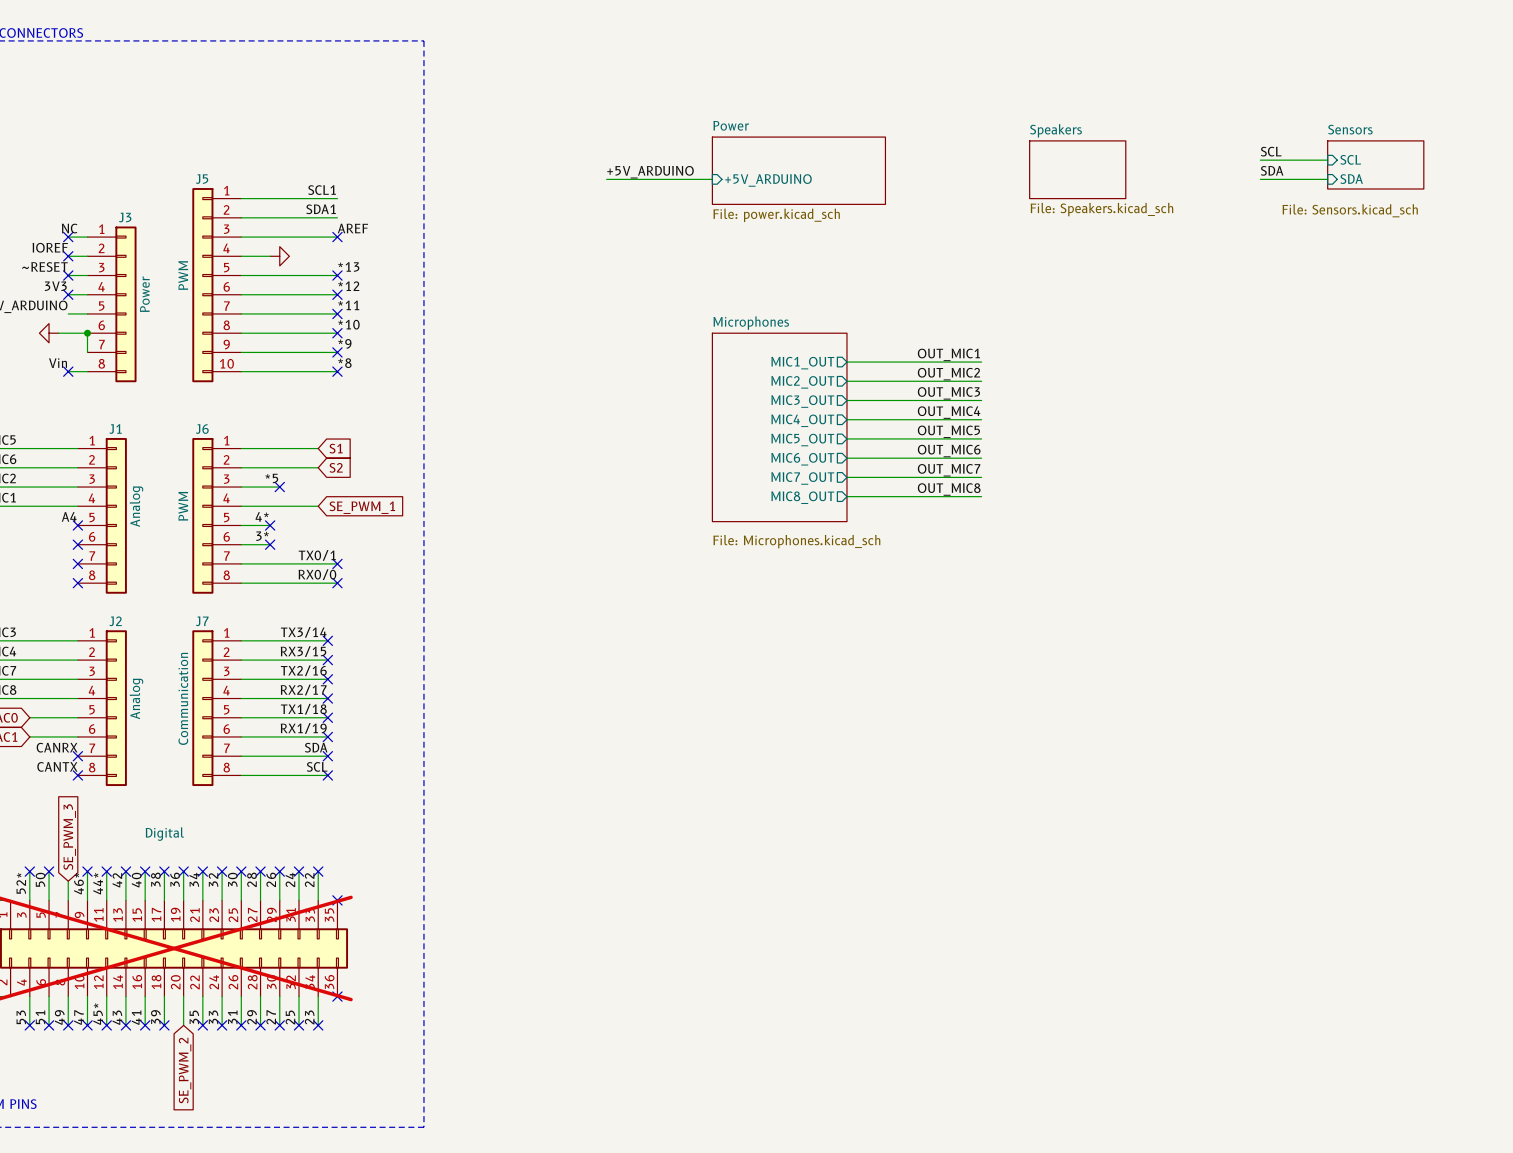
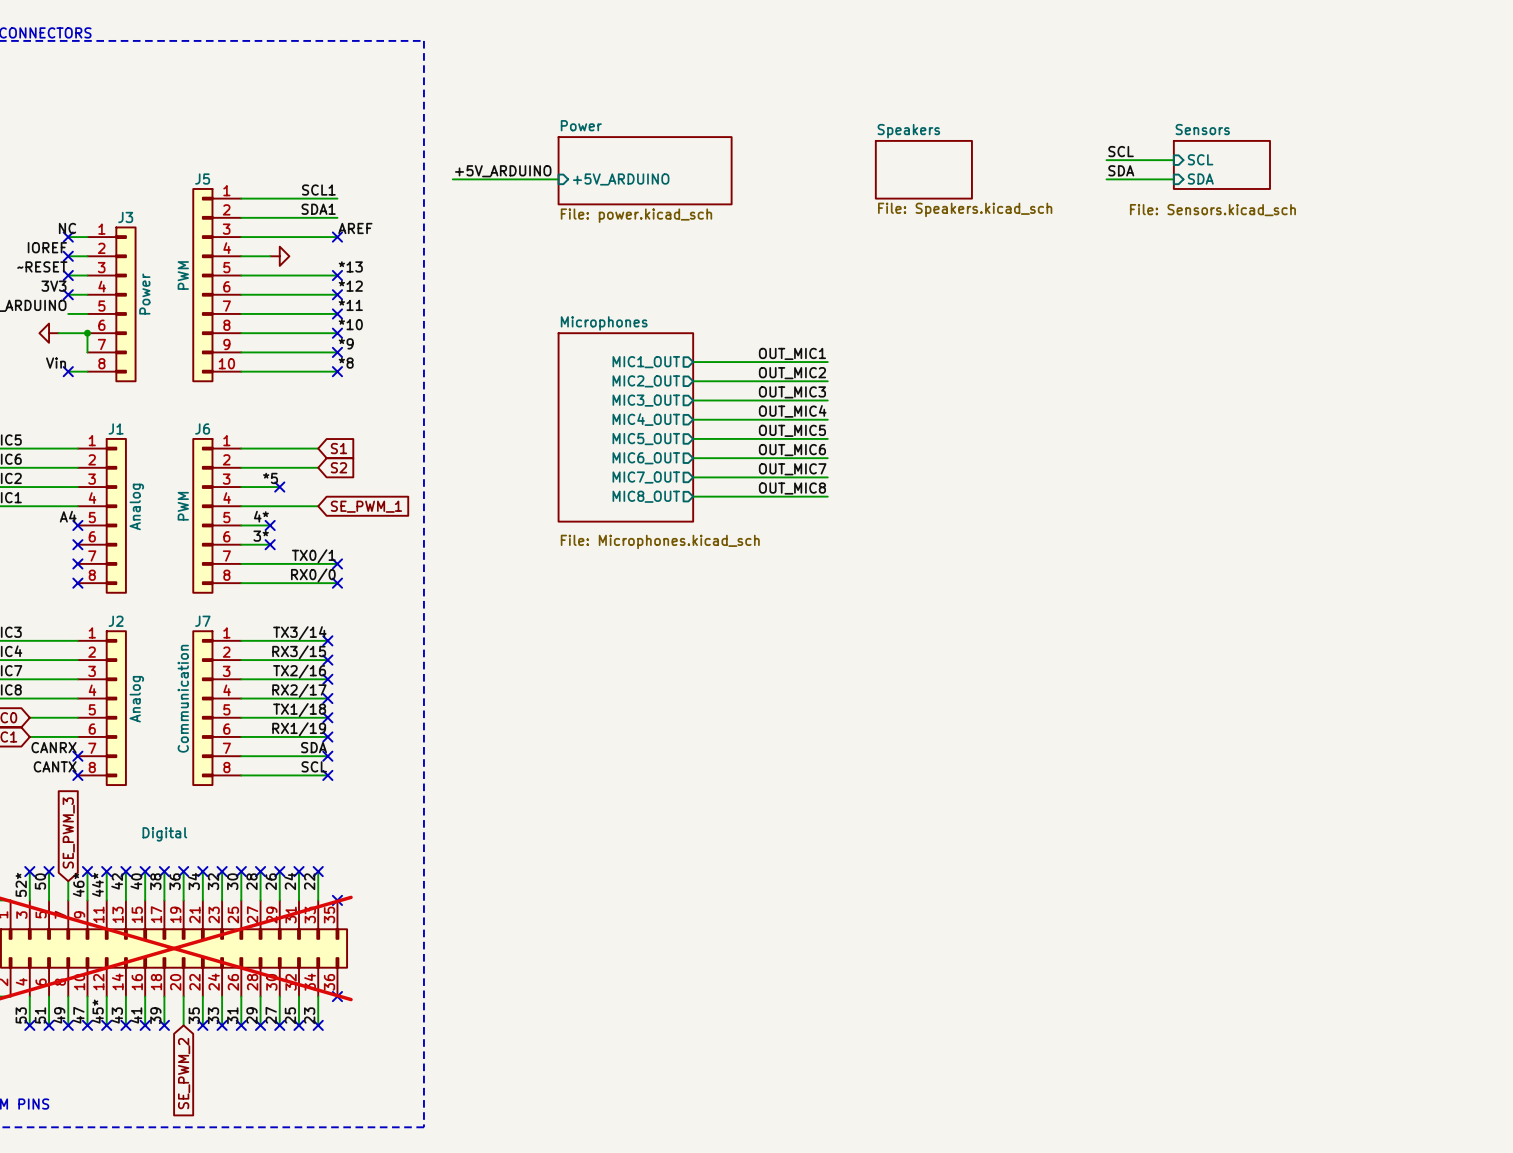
label position: SCL (1271, 151) -> SCL (1121, 151)
sheet pin position: SCL (1350, 159) -> SCL (1200, 159)
wire: (1260, 160) (1327, 160) -> (1106, 160) (1173, 160)
sheet Sensors position: (1375, 164) -> (1221, 164)
sheet Speakers position: (1077, 169) -> (923, 169)
sheet Power position: (798, 170) -> (645, 170)
label position: SDA (1272, 170) -> SDA (1121, 170)
label position: +5V_ARDUINO (650, 172) -> +5V_ARDUINO (503, 171)
wire: (606, 179) (712, 179) -> (452, 179) (558, 179)
wire: (1260, 179) (1327, 179) -> (1106, 179) (1173, 179)
sheet pin position: SDA (1351, 179) -> SDA (1200, 179)
sheet pin position: +5V_ARDUINO (768, 180) -> +5V_ARDUINO (621, 179)
label position: OUT_MIC1 (948, 354) -> OUT_MIC1 (792, 353)
wire: (846, 362) (981, 362) -> (693, 362) (827, 362)
sheet pin position: MIC1_OUT (802, 363) -> MIC1_OUT (646, 362)
label position: OUT_MIC2 (948, 374) -> OUT_MIC2 (792, 373)
wire: (846, 381) (981, 381) -> (693, 381) (827, 381)
sheet pin position: MIC2_OUT (802, 382) -> MIC2_OUT (646, 381)
label position: OUT_MIC3 (948, 393) -> OUT_MIC3 (792, 392)
wire: (846, 400) (981, 400) -> (693, 400) (827, 400)
sheet pin position: MIC3_OUT (802, 401) -> MIC3_OUT (646, 400)
label position: OUT_MIC4 (949, 412) -> OUT_MIC4 (792, 411)
wire: (846, 419) (981, 419) -> (693, 419) (827, 419)
sheet pin position: MIC4_OUT (802, 420) -> MIC4_OUT (646, 419)
sheet Microphones position: (779, 427) -> (625, 427)
label position: OUT_MIC5 (948, 431) -> OUT_MIC5 (792, 430)
wire: (846, 438) (981, 438) -> (693, 438) (827, 438)
sheet pin position: MIC5_OUT (802, 440) -> MIC5_OUT (646, 439)
label position: OUT_MIC6 (949, 451) -> OUT_MIC6 (792, 450)
wire: (846, 458) (981, 458) -> (693, 458) (827, 458)
sheet pin position: MIC6_OUT (802, 459) -> MIC6_OUT (646, 458)
label position: OUT_MIC7 (949, 470) -> OUT_MIC7 (792, 469)
wire: (846, 477) (981, 477) -> (693, 477) (827, 477)
sheet pin position: MIC7_OUT (802, 478) -> MIC7_OUT (646, 477)
label position: OUT_MIC8 (949, 489) -> OUT_MIC8 (792, 488)
wire: (846, 496) (981, 496) -> (693, 496) (827, 496)
sheet pin position: MIC8_OUT (802, 497) -> MIC8_OUT (646, 496)

